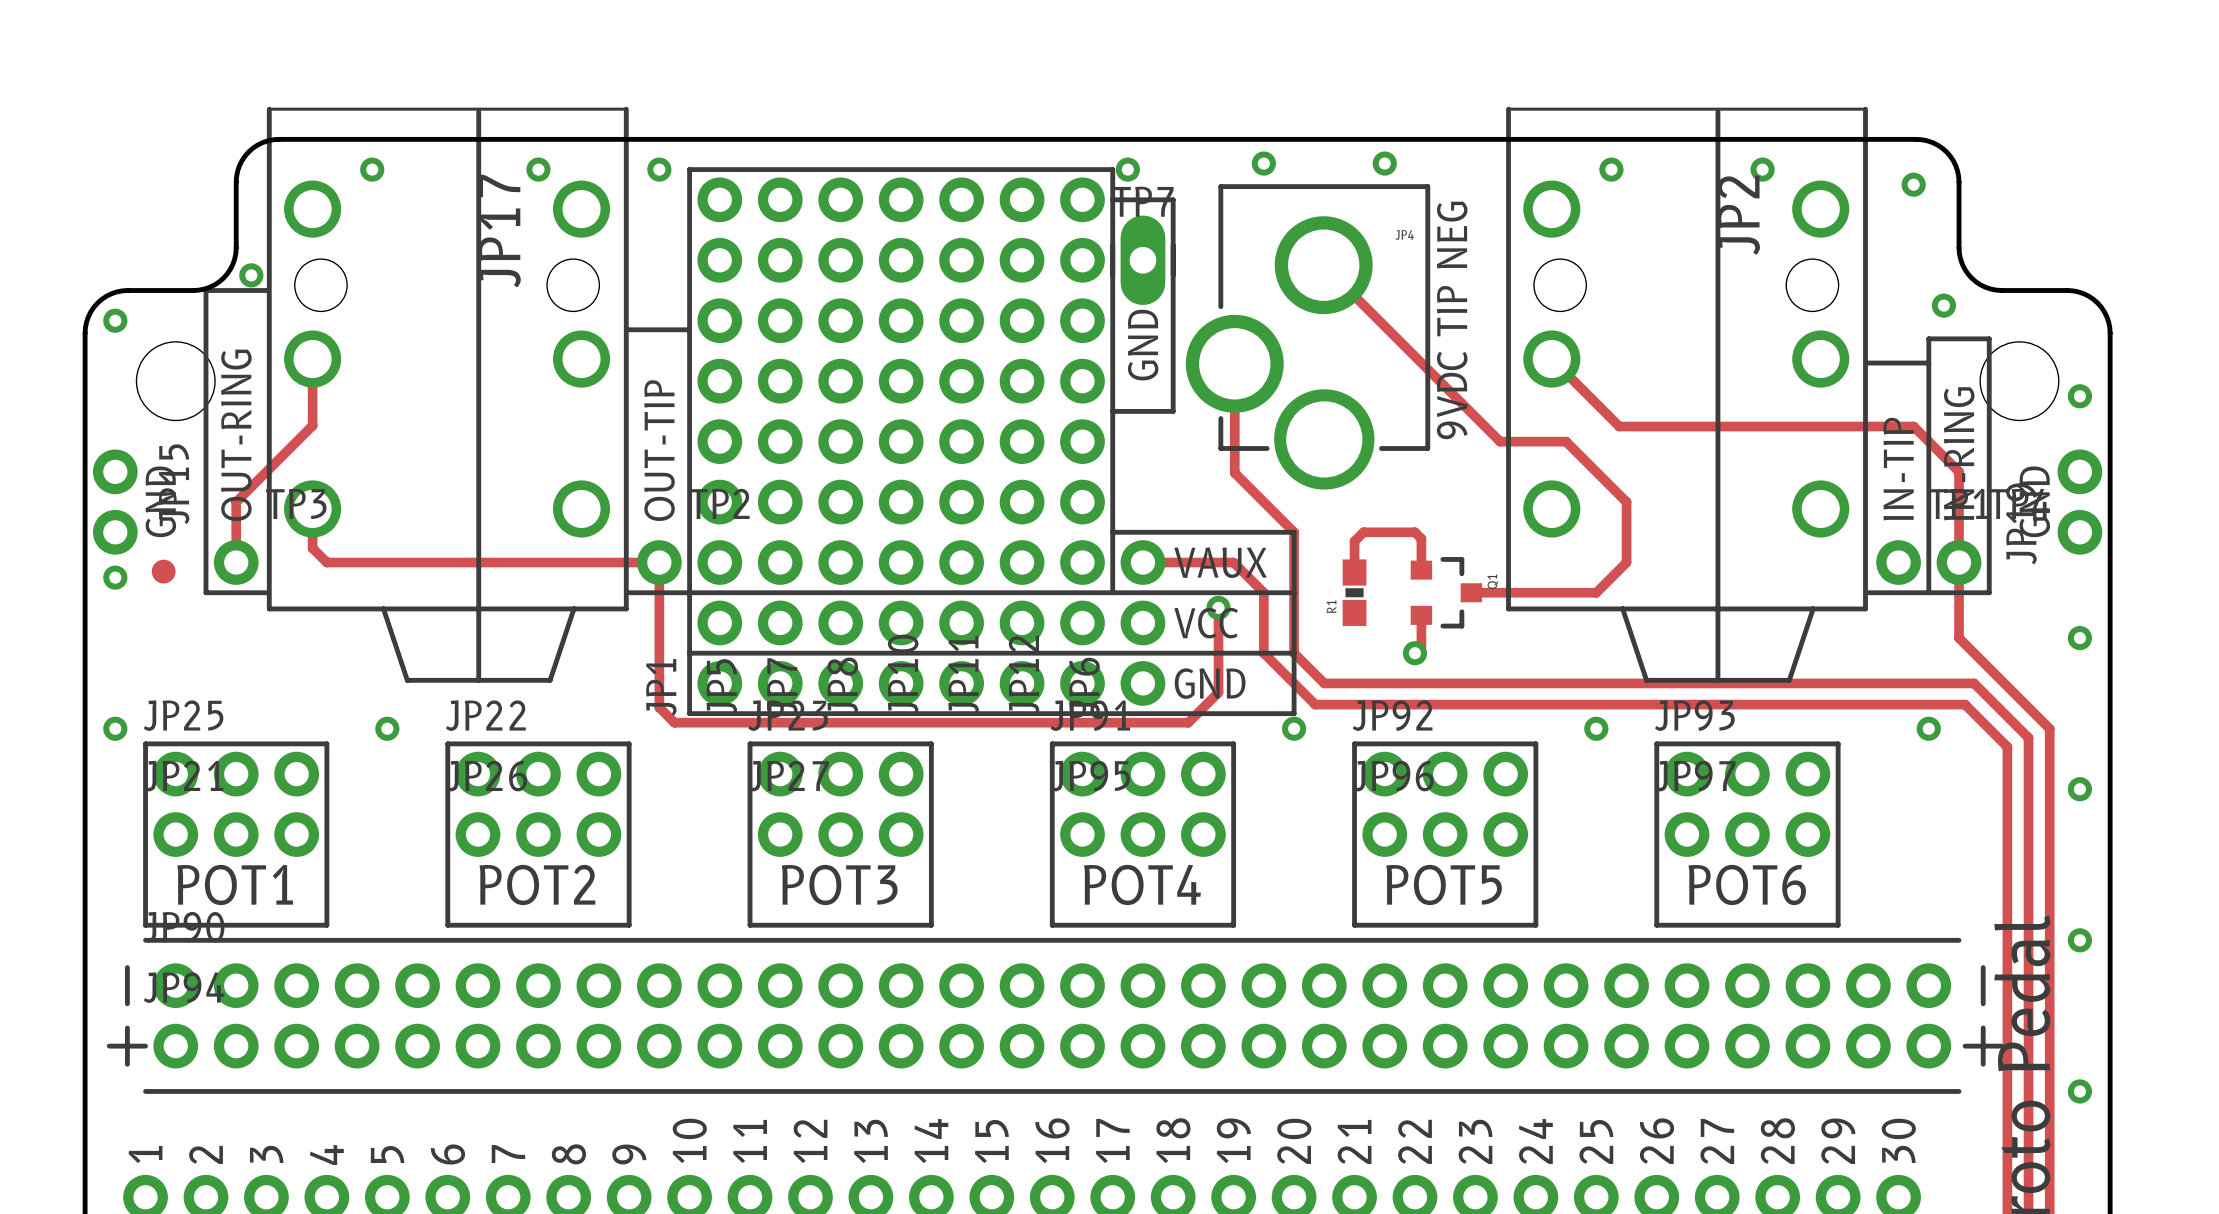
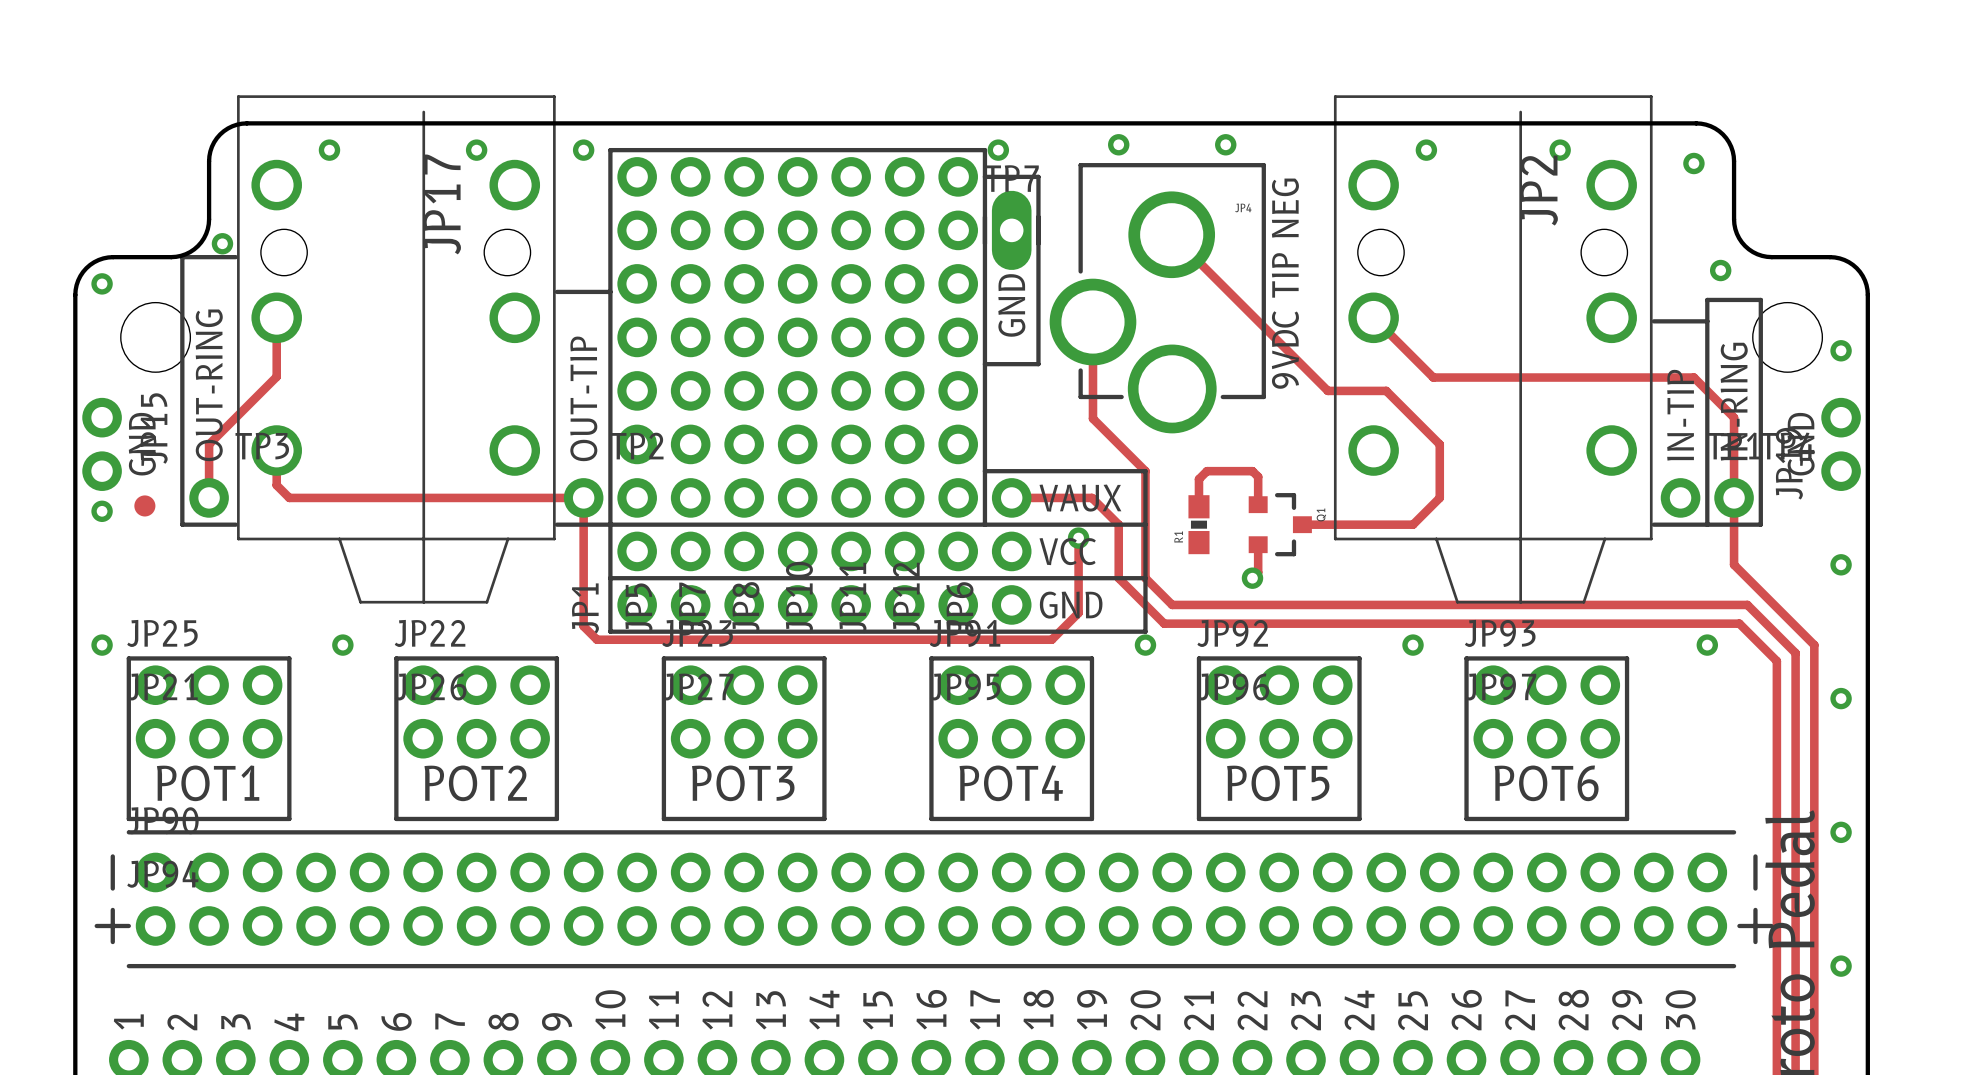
JP17 footprint: [266, 106, 629, 683] -> [237, 95, 556, 604]
JP2 footprint: [1506, 106, 1868, 683] -> [1333, 95, 1653, 604]

